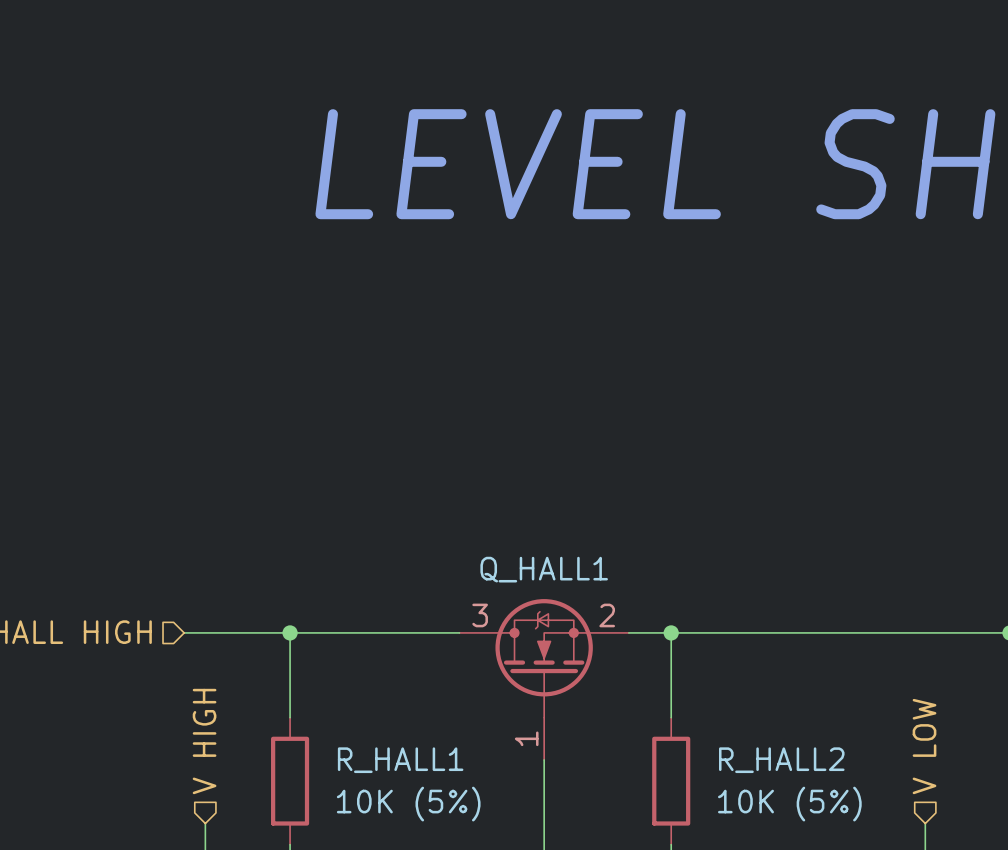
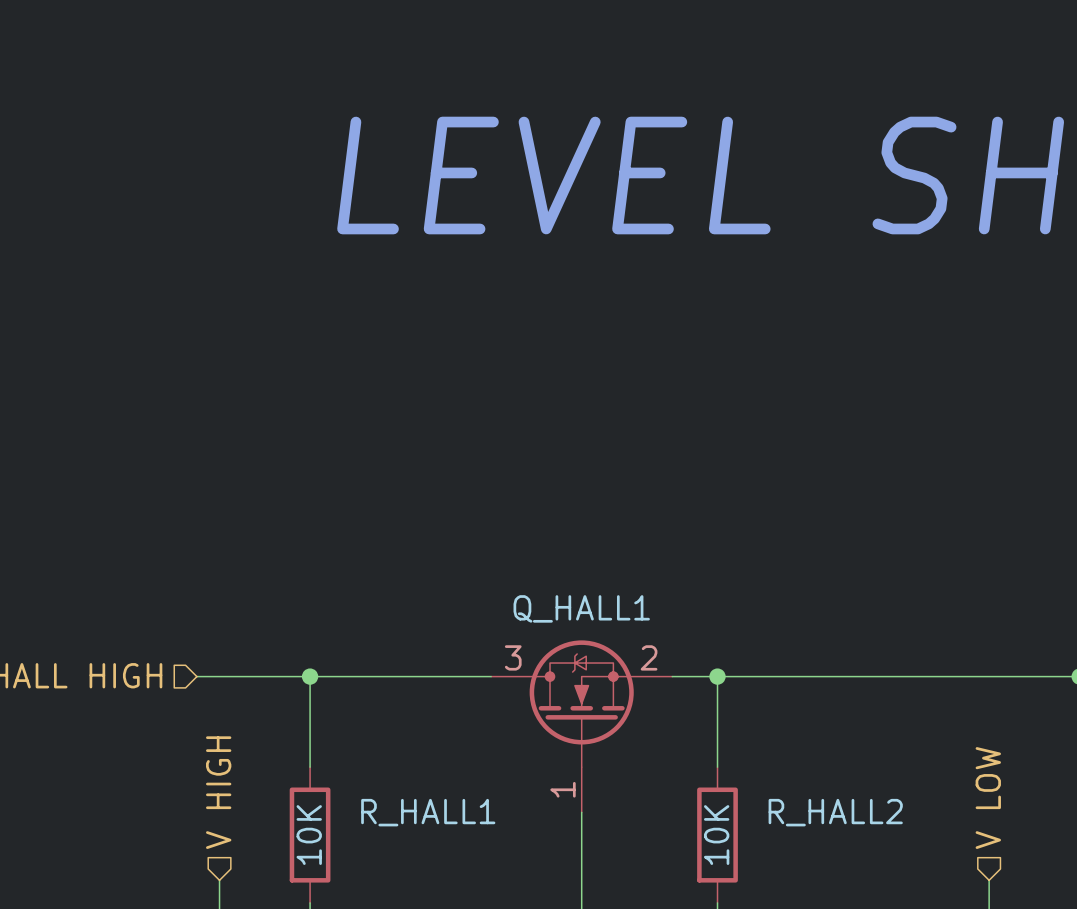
R_HALL1 value: 10K (5%) (408, 804) -> 10K (309, 835)
R_HALL2 value: 10K (5%) (789, 804) -> 10K (716, 835)

